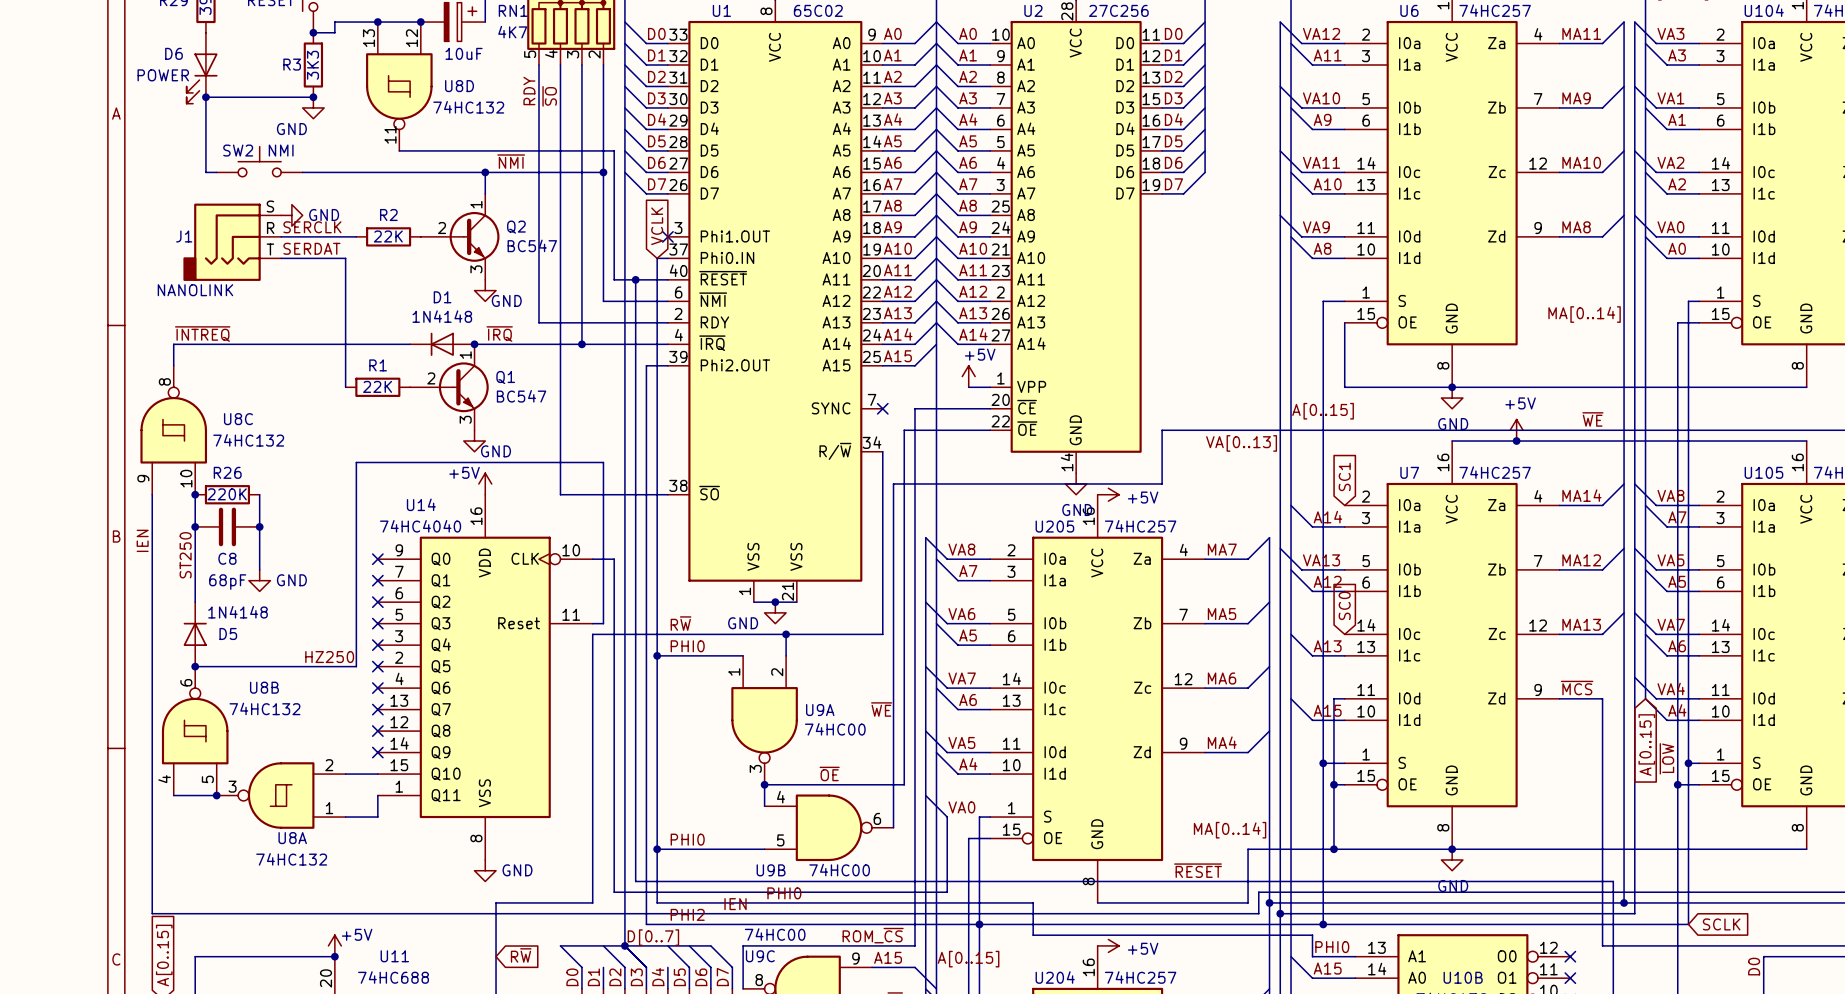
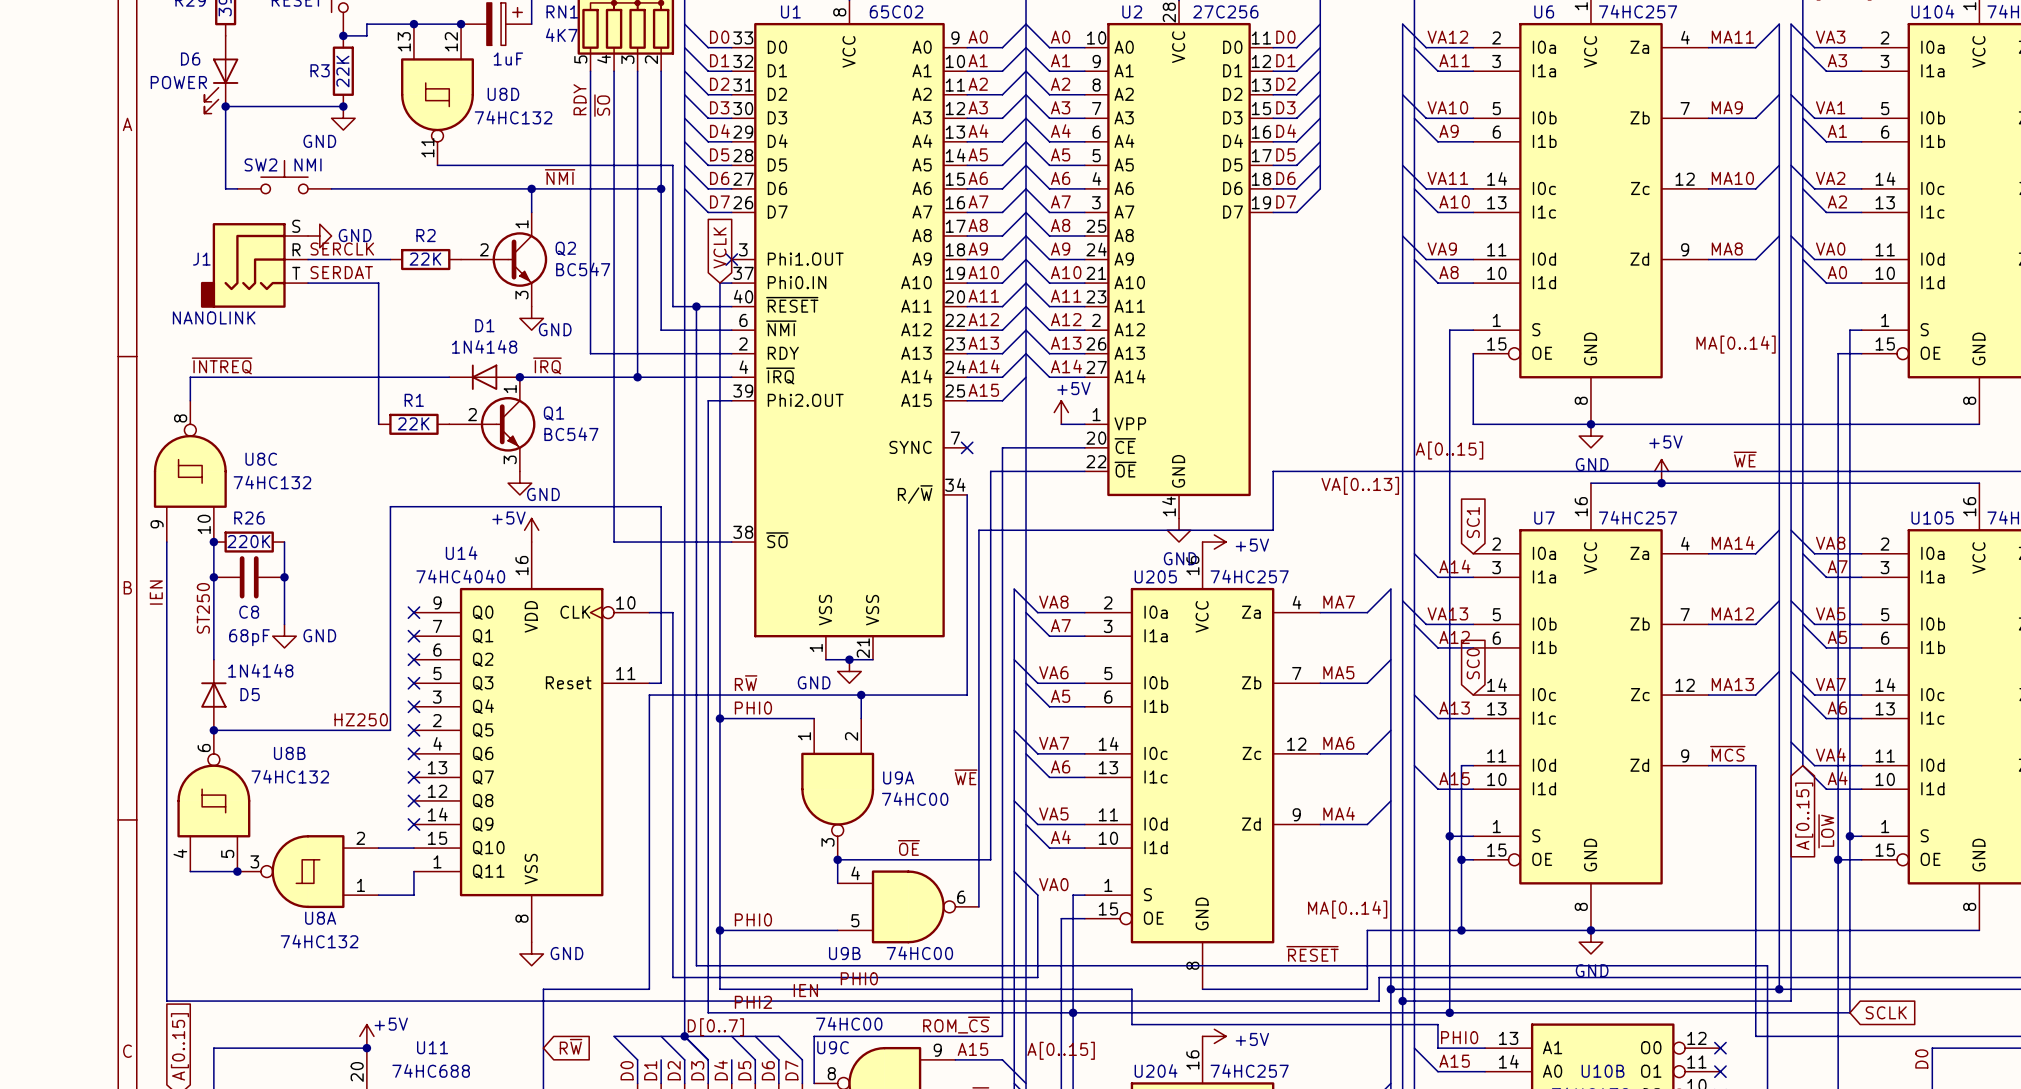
part value: 10uF (464, 53) -> 1uF (508, 59)
R3 value: 3K3 (312, 65) -> 22K (342, 71)

